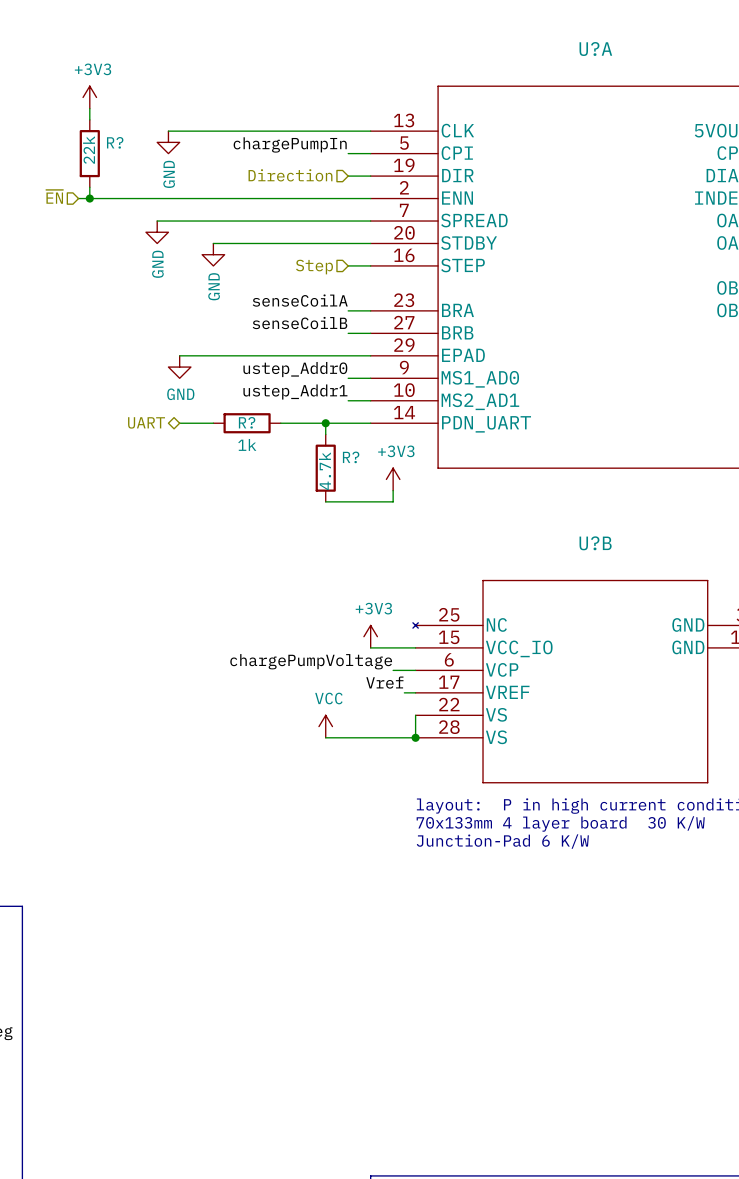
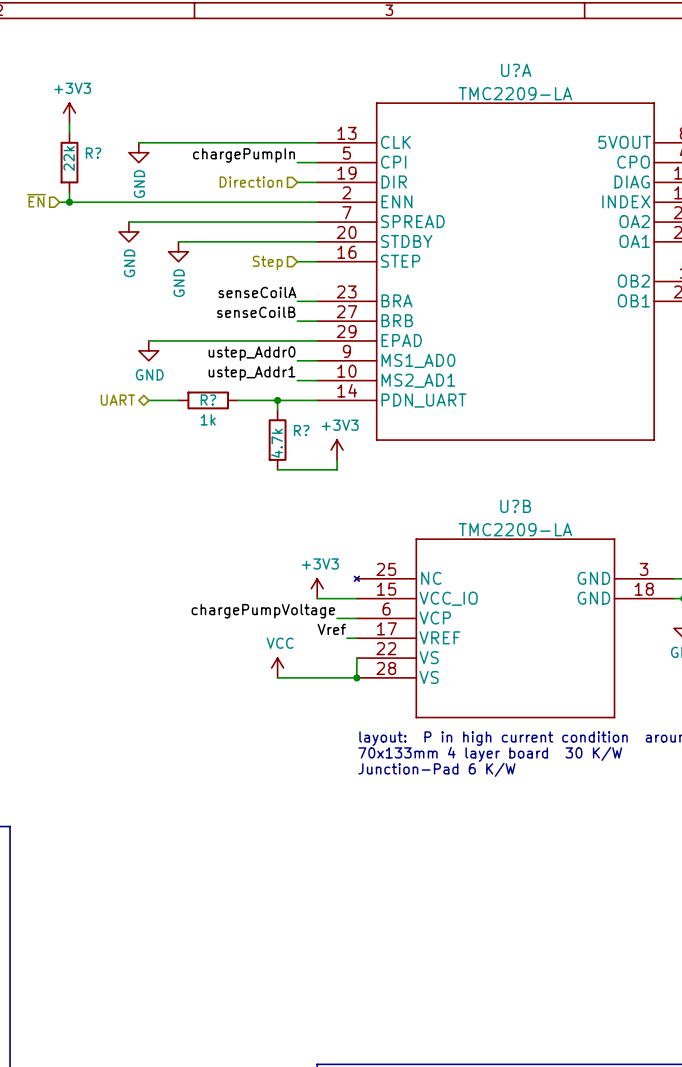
U?A value: none -> TMC2209-LA (515, 93)
U?B value: none -> TMC2209-LA (515, 529)

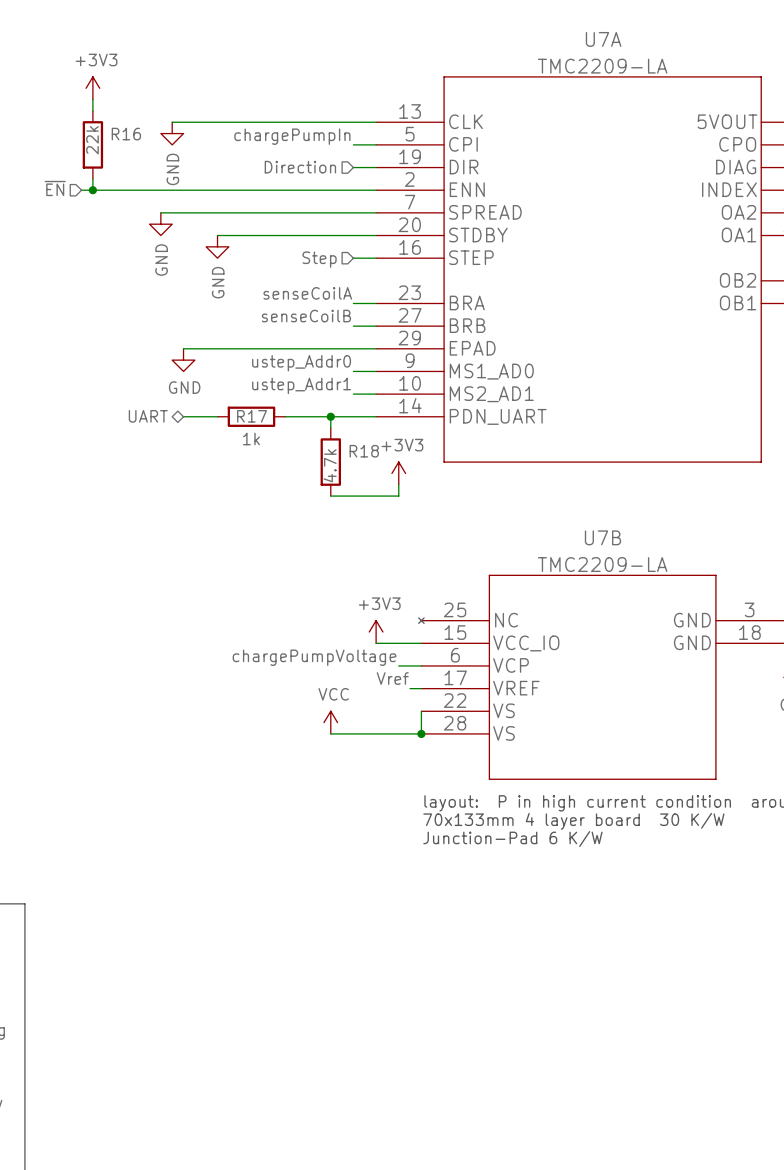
U?A name: U?A (516, 70) -> U7A (603, 39)
R? name: R? (93, 153) -> R16 (126, 134)
R? name: R? (208, 400) -> R17 (252, 416)
R? name: R? (301, 430) -> R18 (364, 451)
U?B name: U?B (515, 506) -> U7B (602, 537)

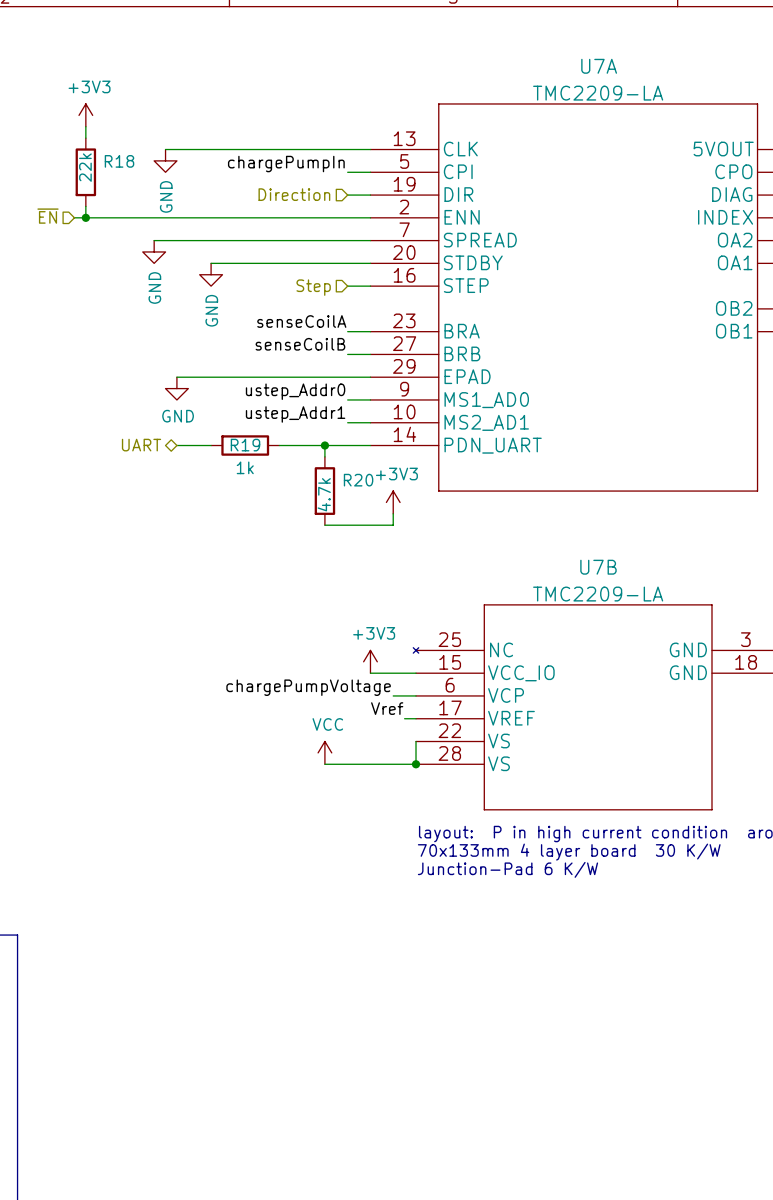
R16 name: R16 (126, 134) -> R18 (119, 161)
R17 name: R17 (252, 416) -> R19 (245, 445)
R18 name: R18 (364, 451) -> R20 (358, 480)

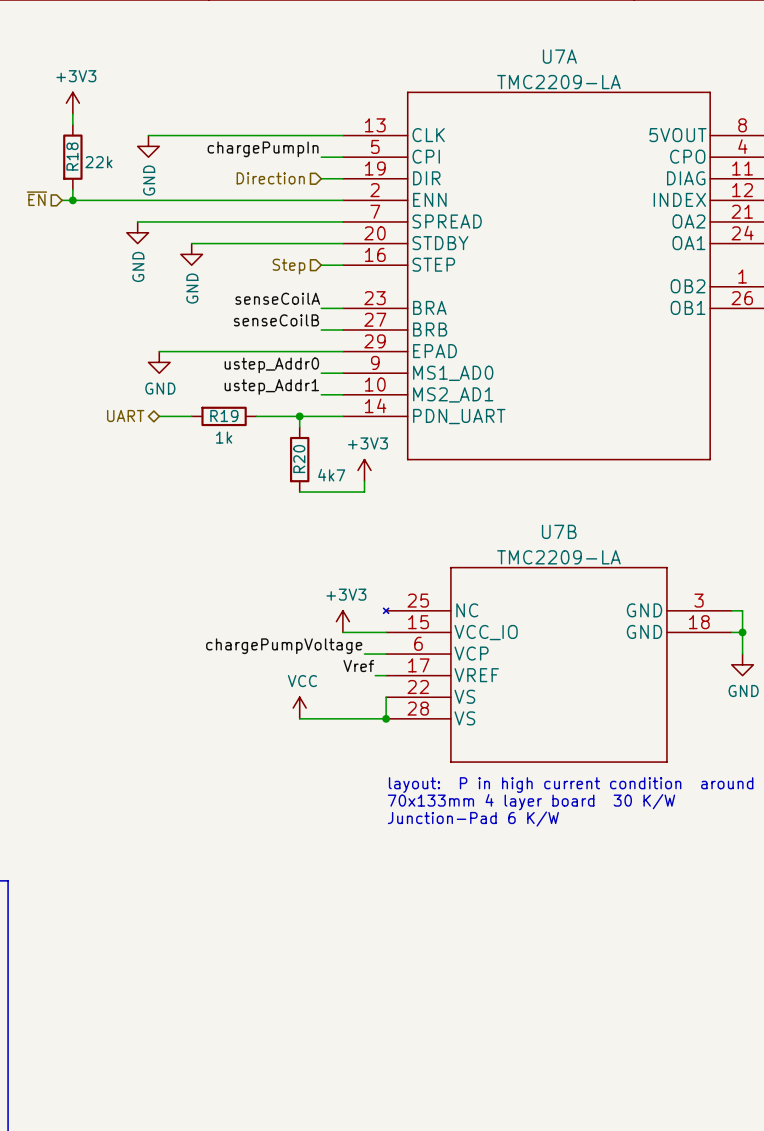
R18 name rotation: 0° (119, 161) -> 90° counterclockwise (72, 156)
R18 value rotation: 0° (85, 167) -> 90° clockwise (98, 162)
R20 name rotation: 0° (358, 480) -> 90° counterclockwise (299, 459)
R20 value: 4.7k (324, 494) -> 4k7 (331, 475)

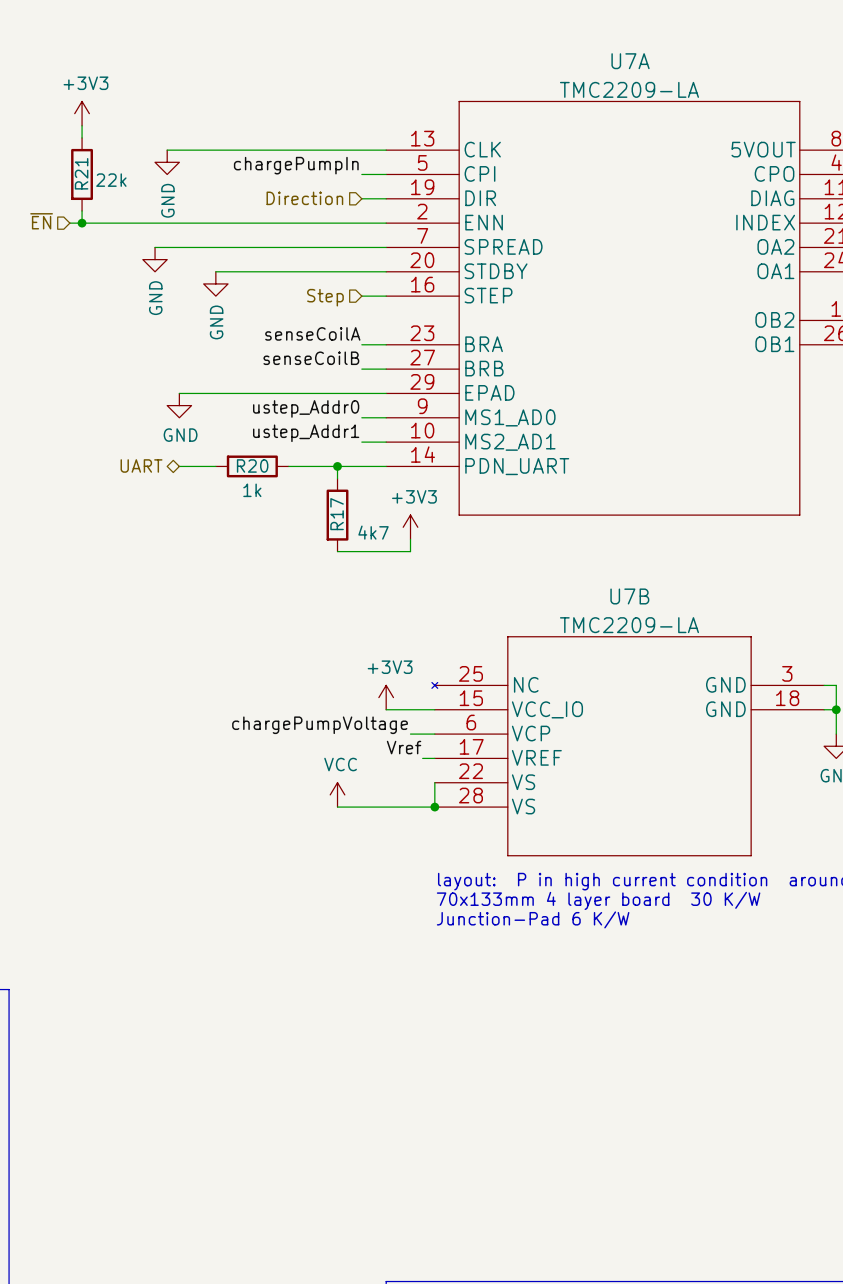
R18 name: R18 (72, 156) -> R21 (81, 173)
R19 name: R19 (224, 416) -> R20 (252, 465)
R20 name: R20 (299, 459) -> R17 (337, 514)

